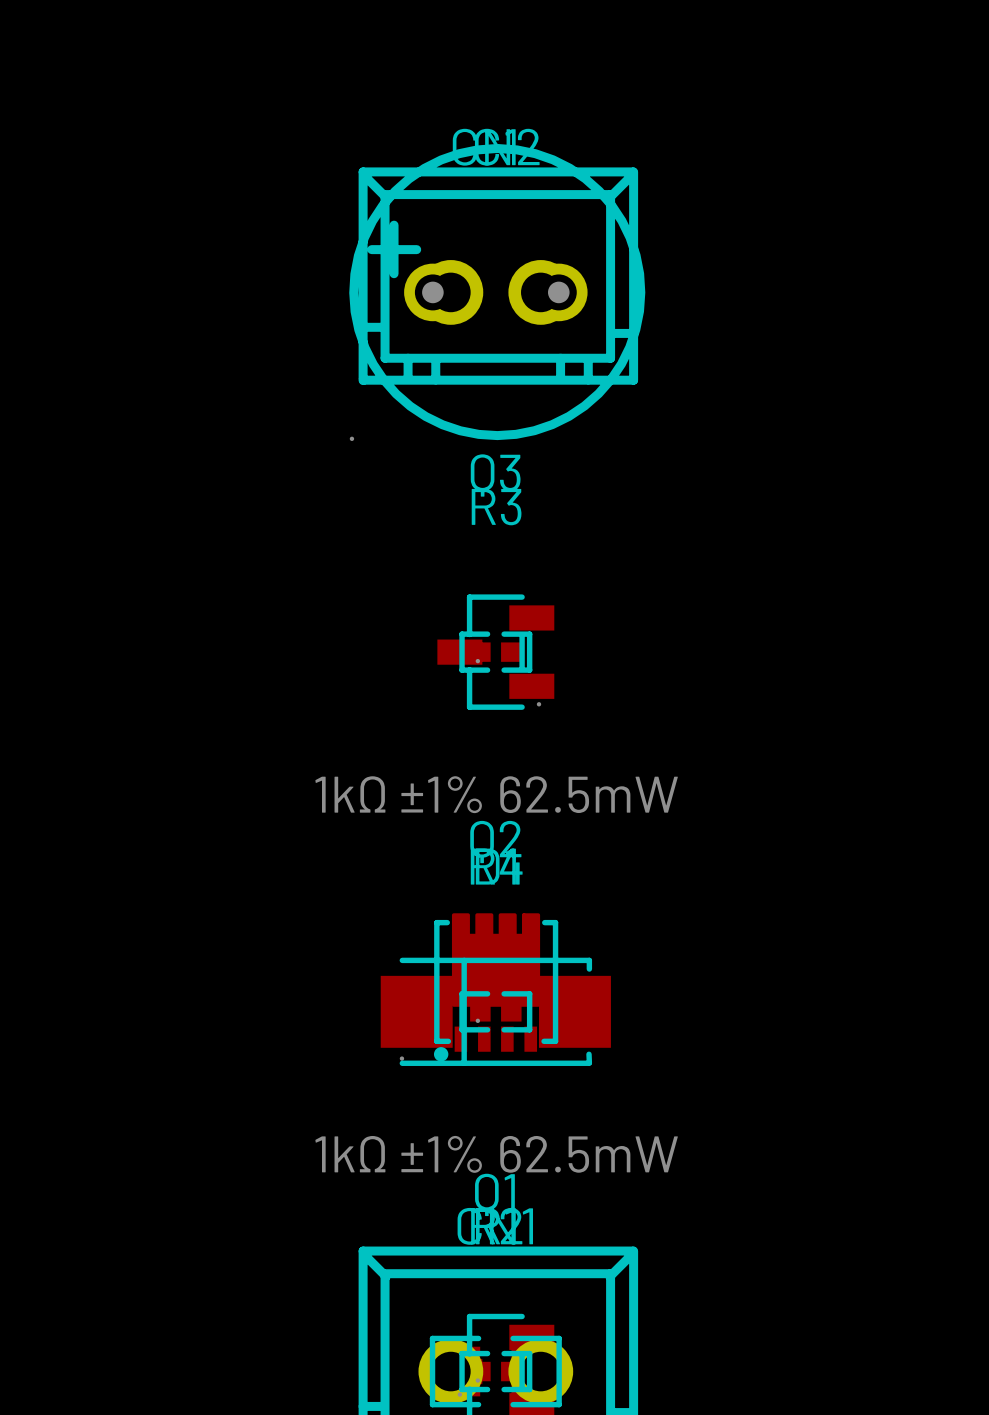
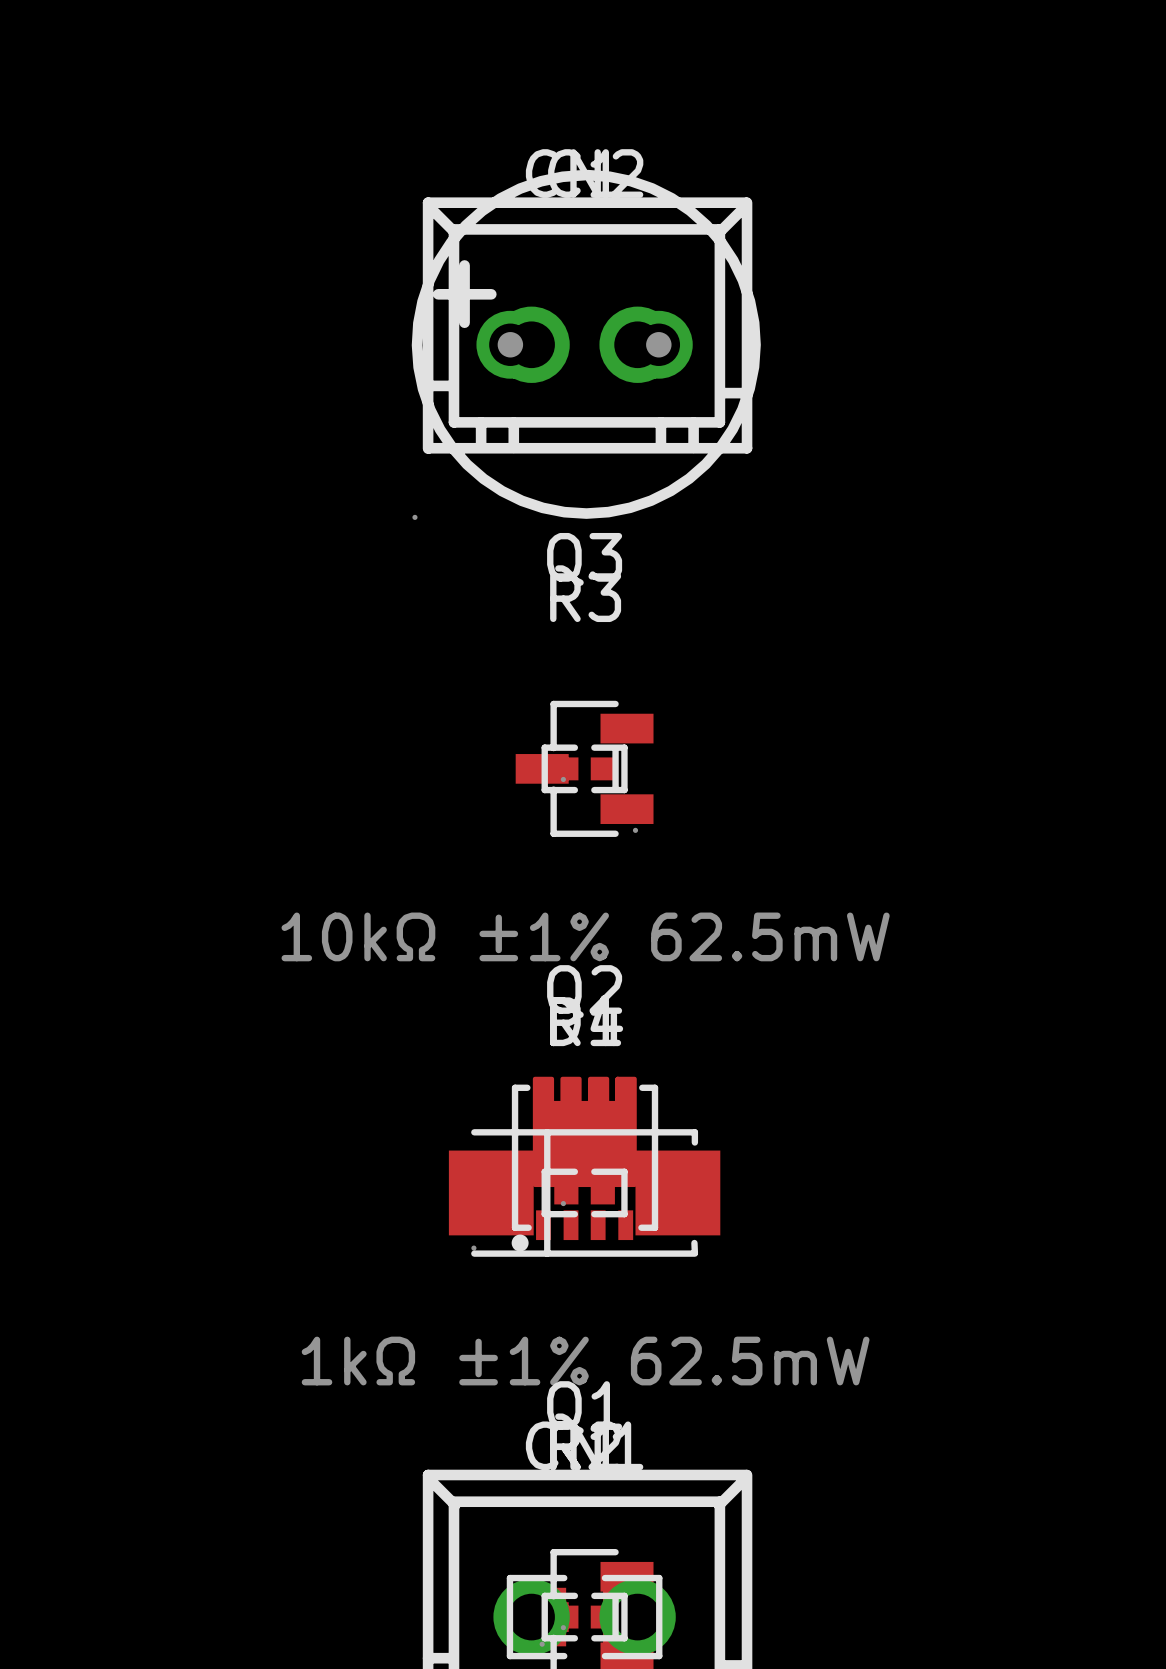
R3 value: 1kΩ ±1% 62.5mW (496, 794) -> 10kΩ ±1% 62.5mW (585, 936)

